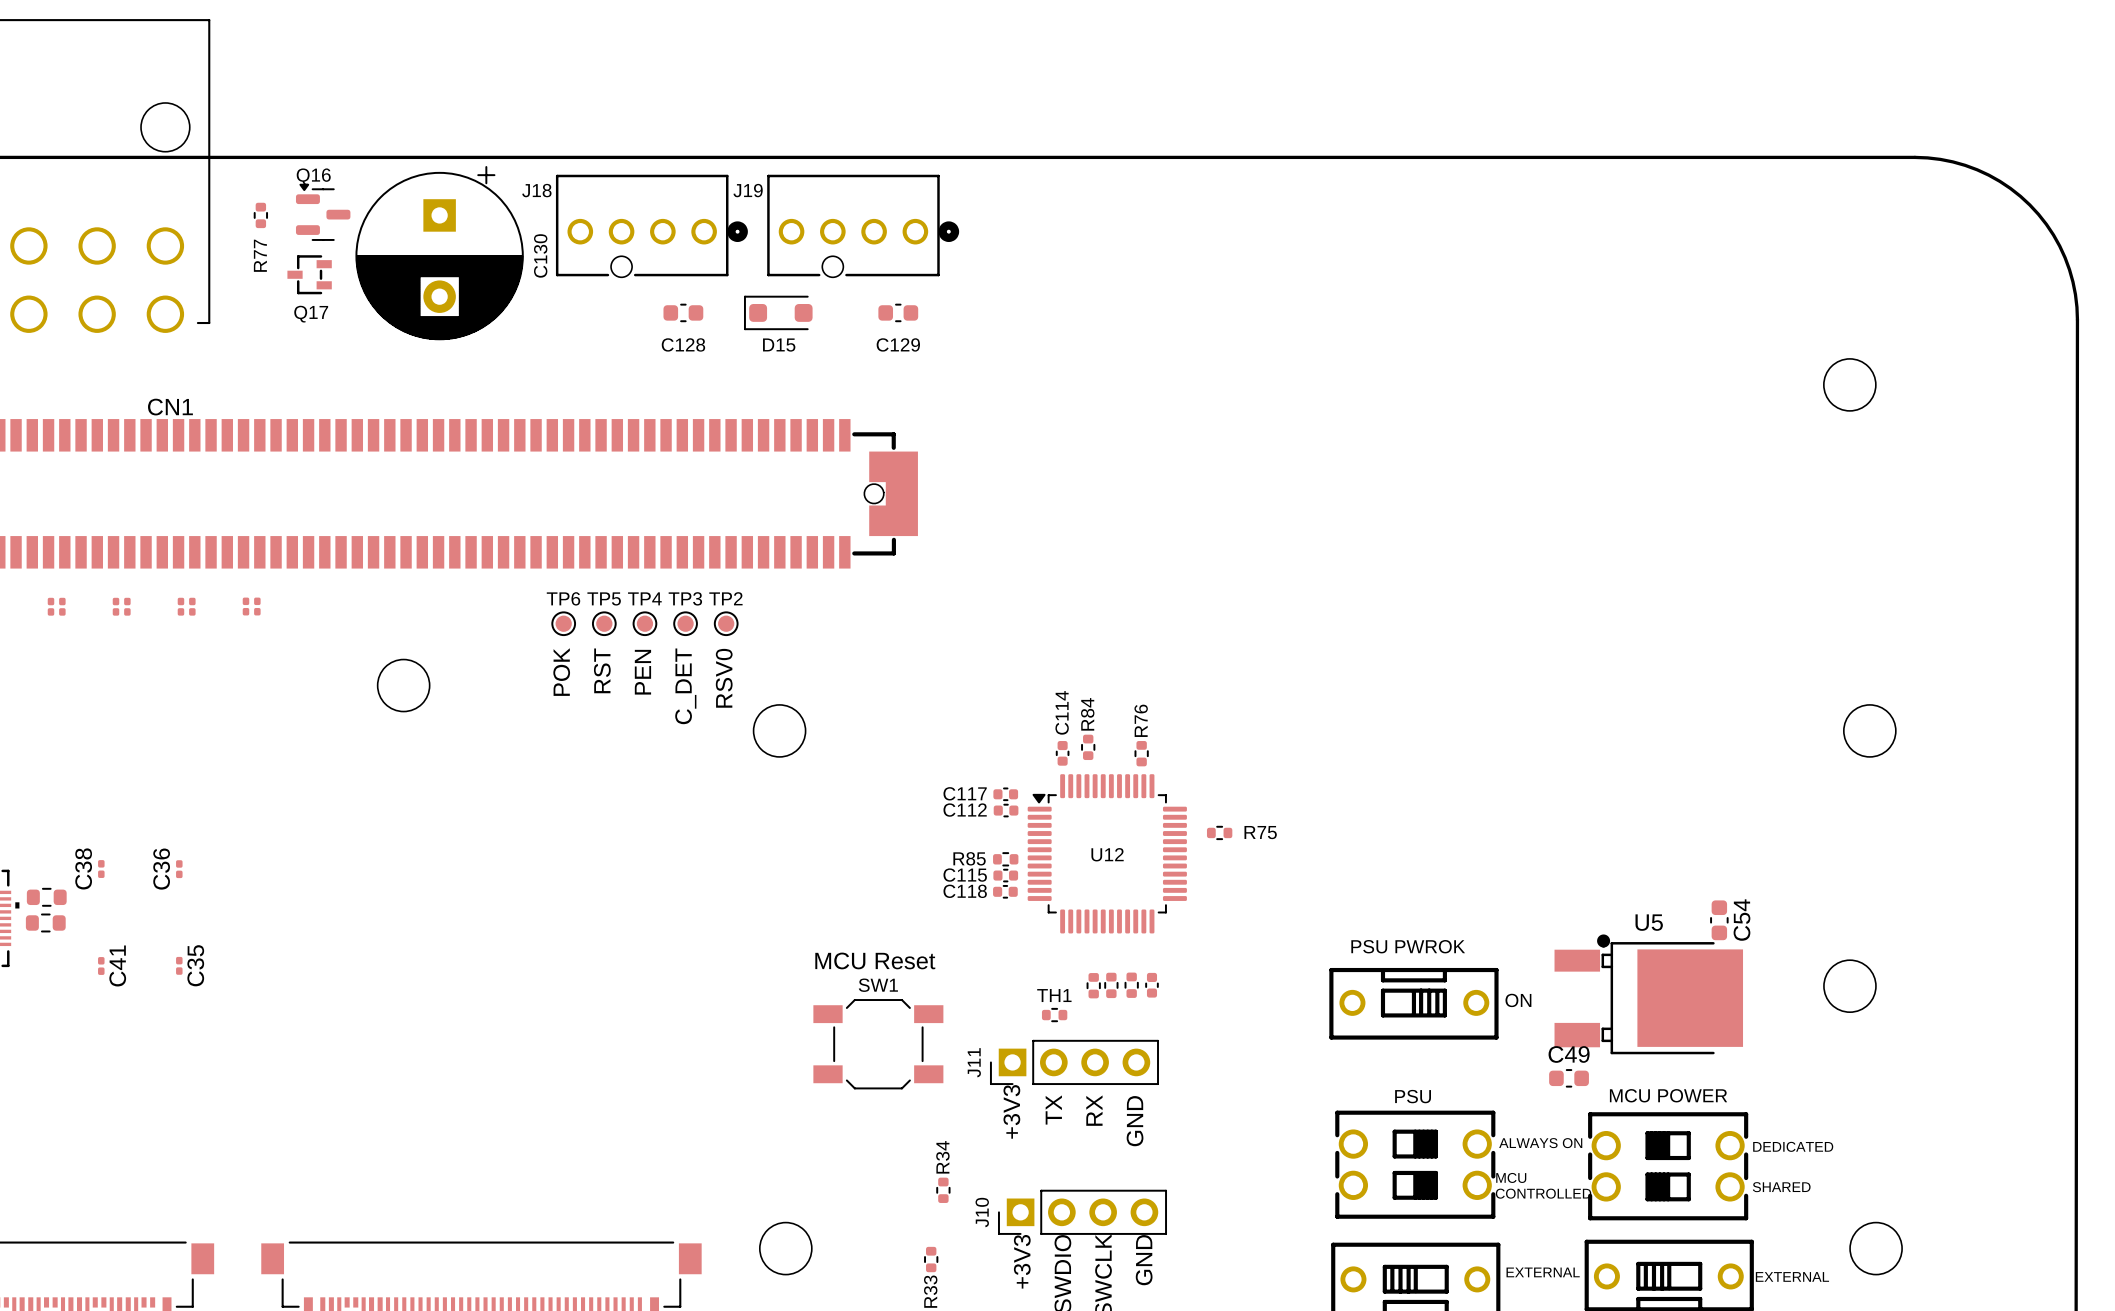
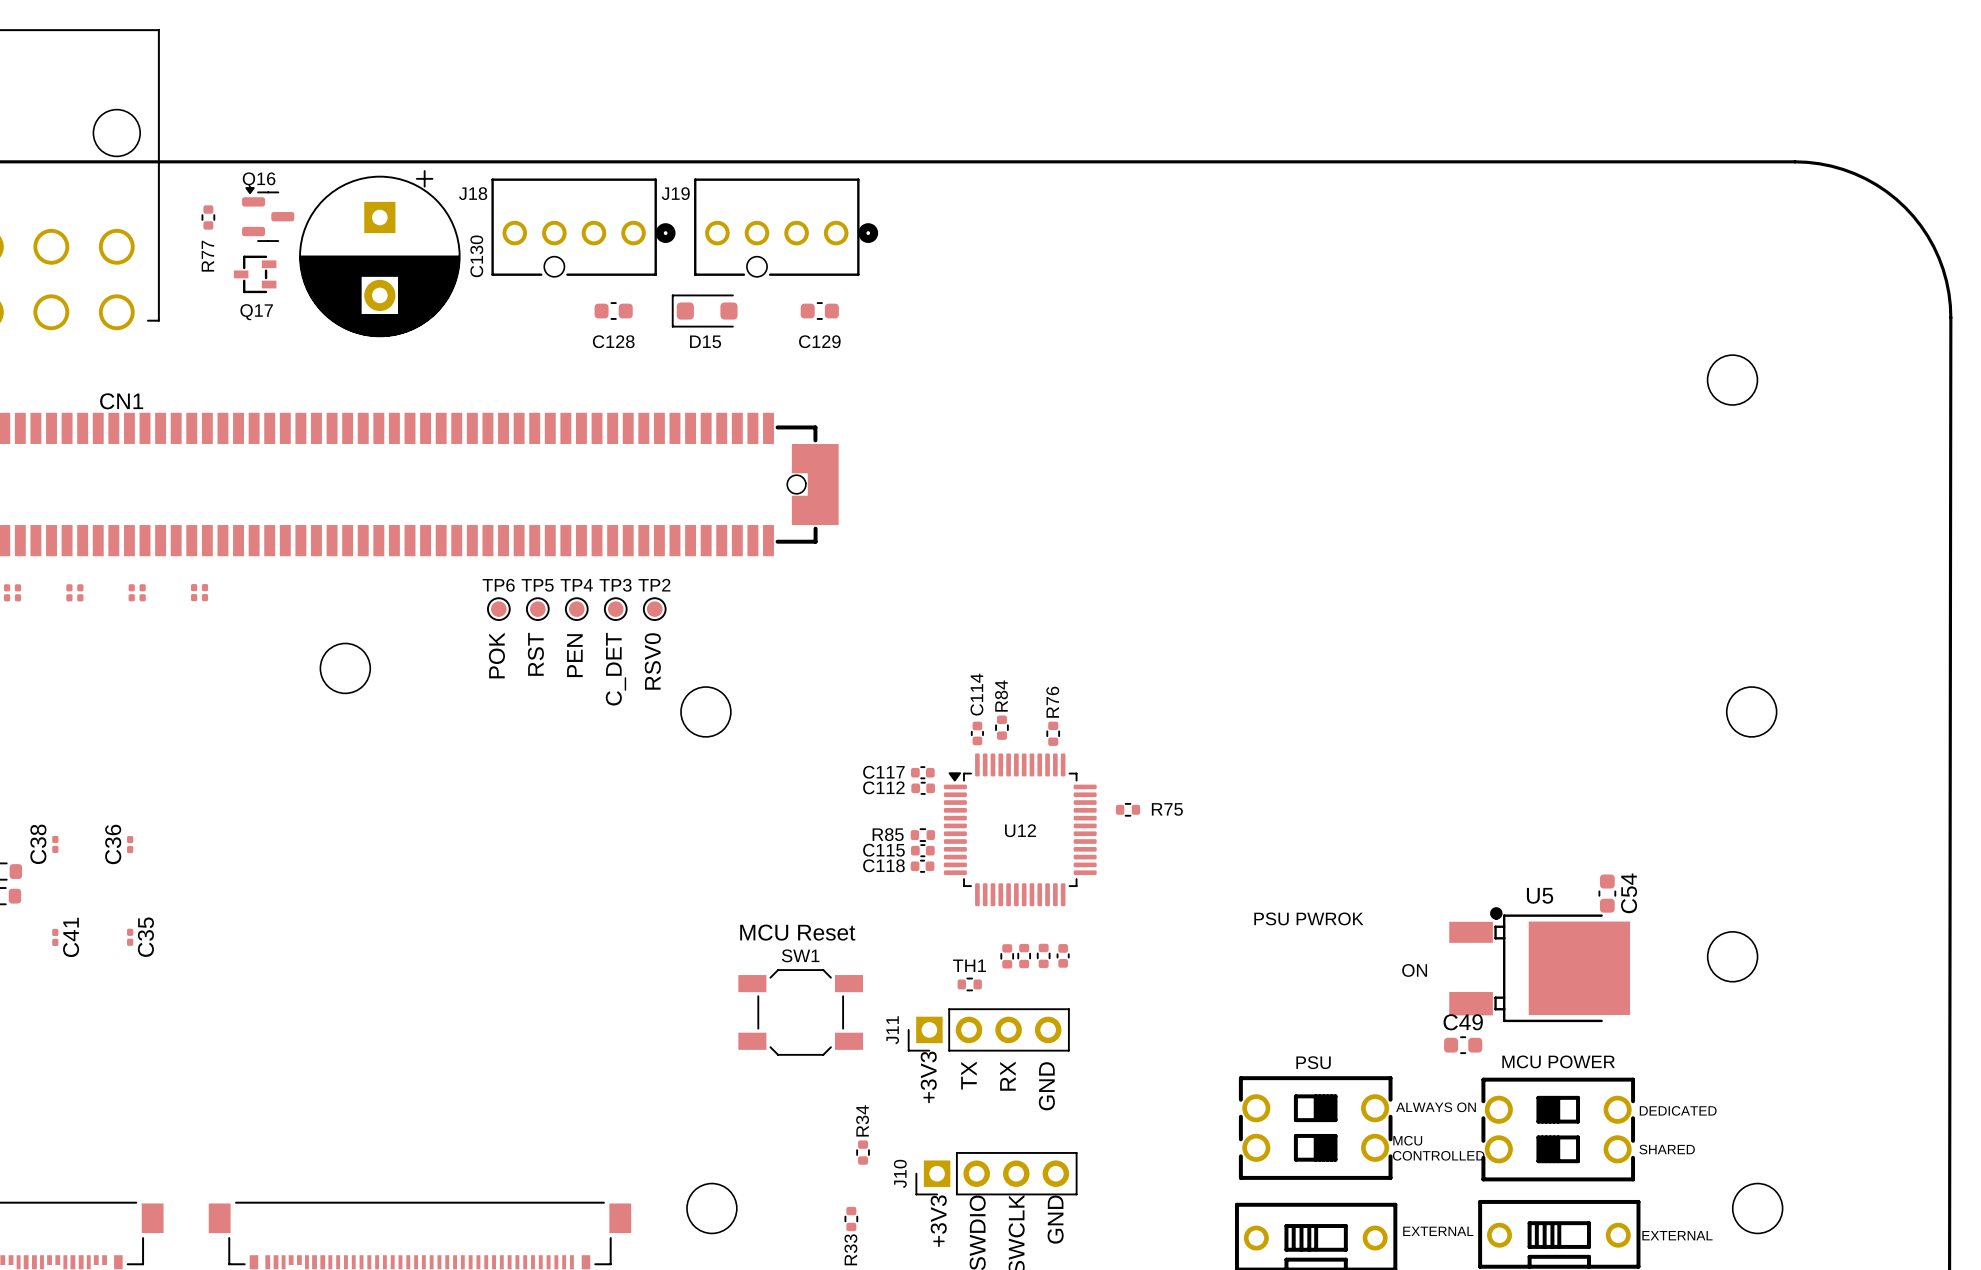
part: (1413, 1003) -> none

